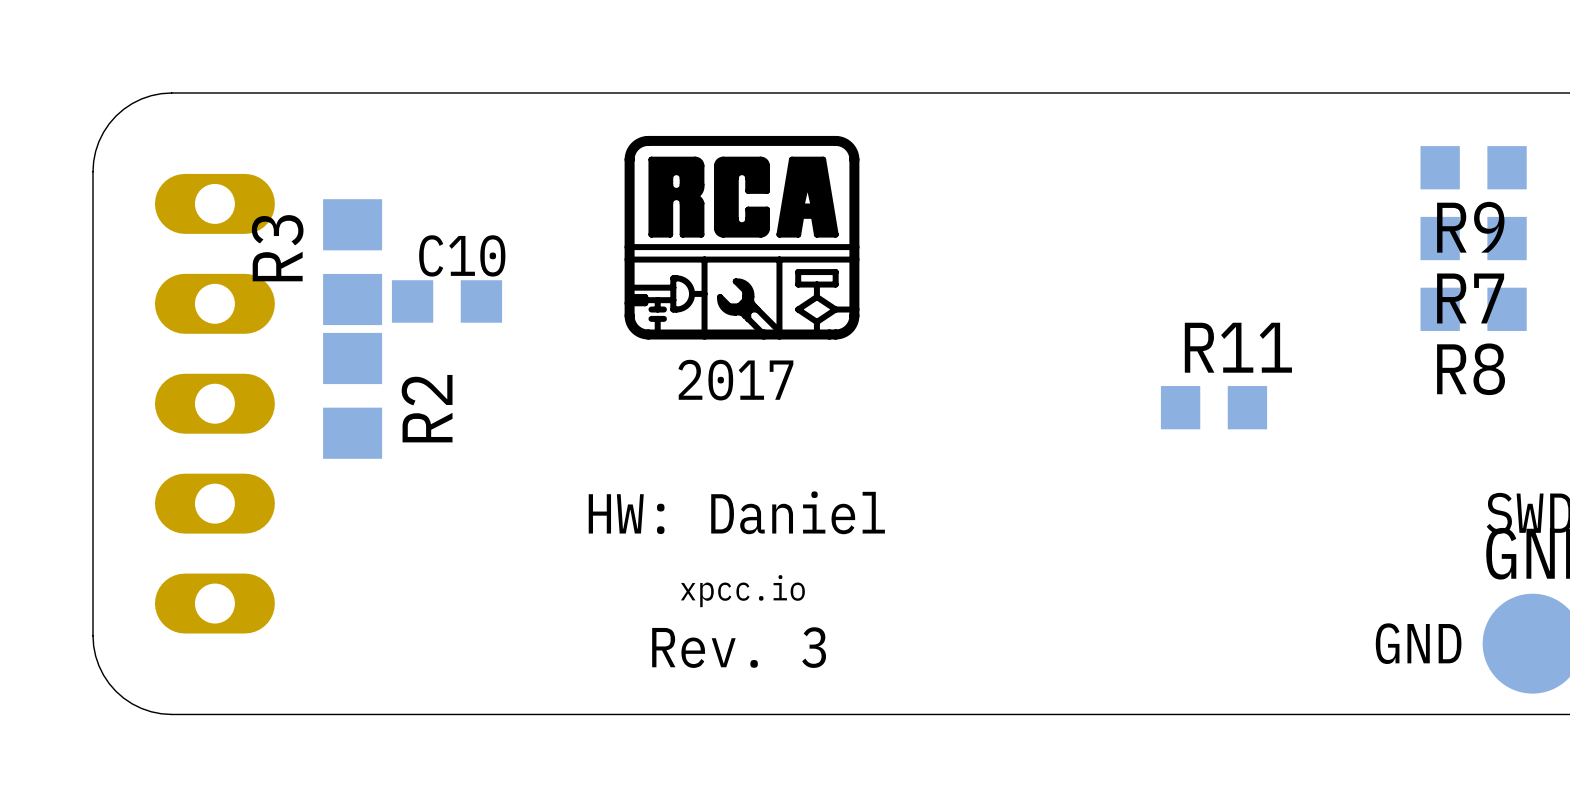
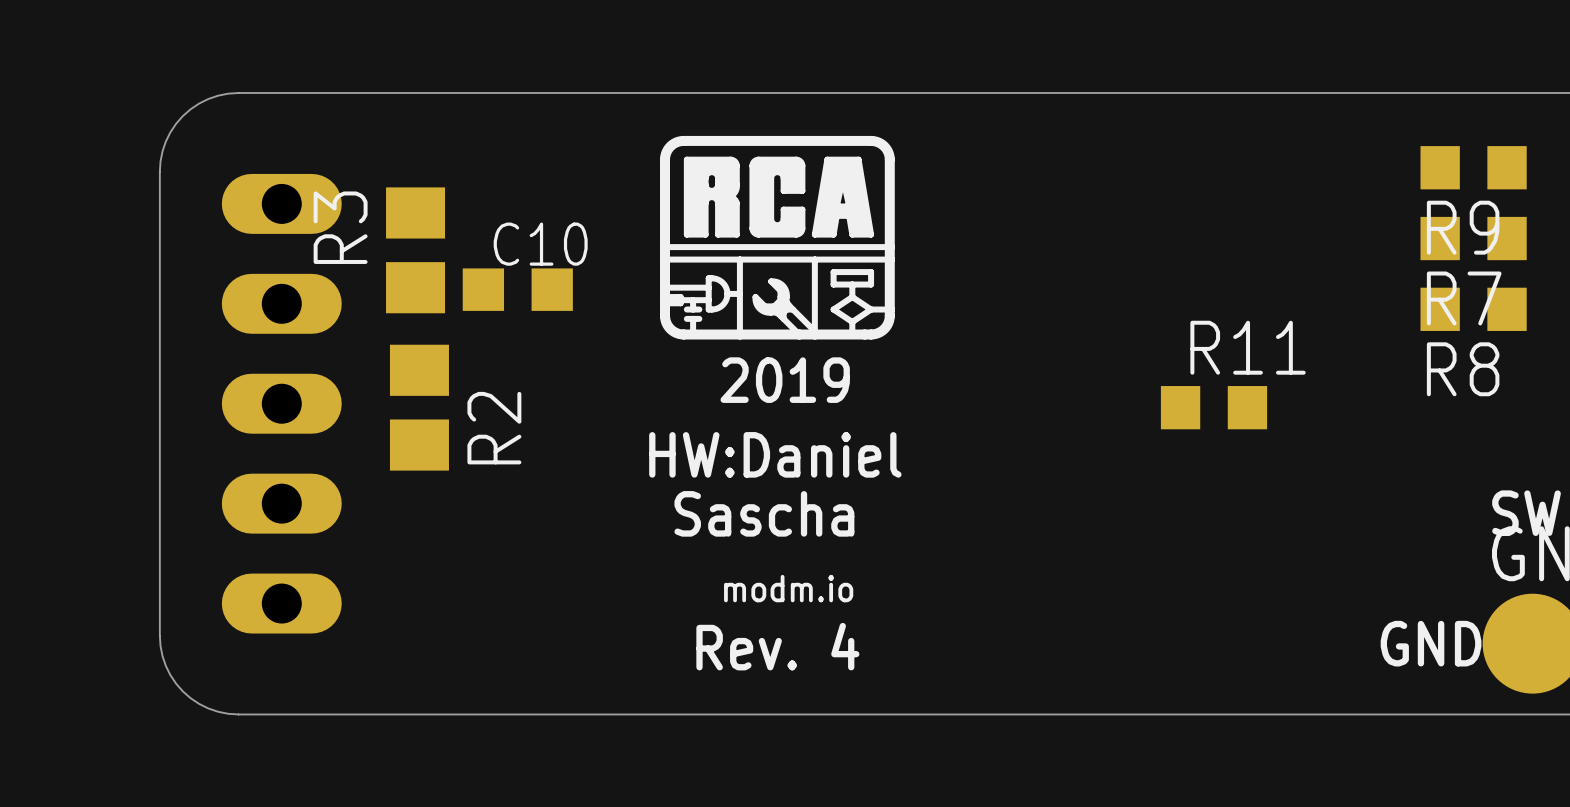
board edge: (238, 92) (161, 93) (132, 103) (116, 116) (103, 132) (95, 151) (92, 171) (92, 635) (95, 656) (109, 683) (123, 698) (141, 708) (171, 714) (238, 714) -> (238, 92) (208, 98) (182, 116) (165, 141) (159, 171) (160, 646) (170, 675) (190, 698) (208, 708) (238, 714)
drawing position: (742, 237) -> (777, 237)
R3 position: (352, 262) -> (415, 250)
C10 position: (447, 301) -> (517, 289)
text: 2017 (735, 380) -> 2019 (785, 380)
R2 position: (352, 395) -> (419, 407)
part position: (214, 403) -> (281, 403)
text: HW: Daniel (736, 512) -> HW:Daniel (775, 454)
text: none -> Sascha (764, 513)
text: none -> modm.io (788, 588)
text: xpcc.io (742, 591) -> none
text: Rev. 3 (739, 647) -> Rev. 4 (777, 646)

